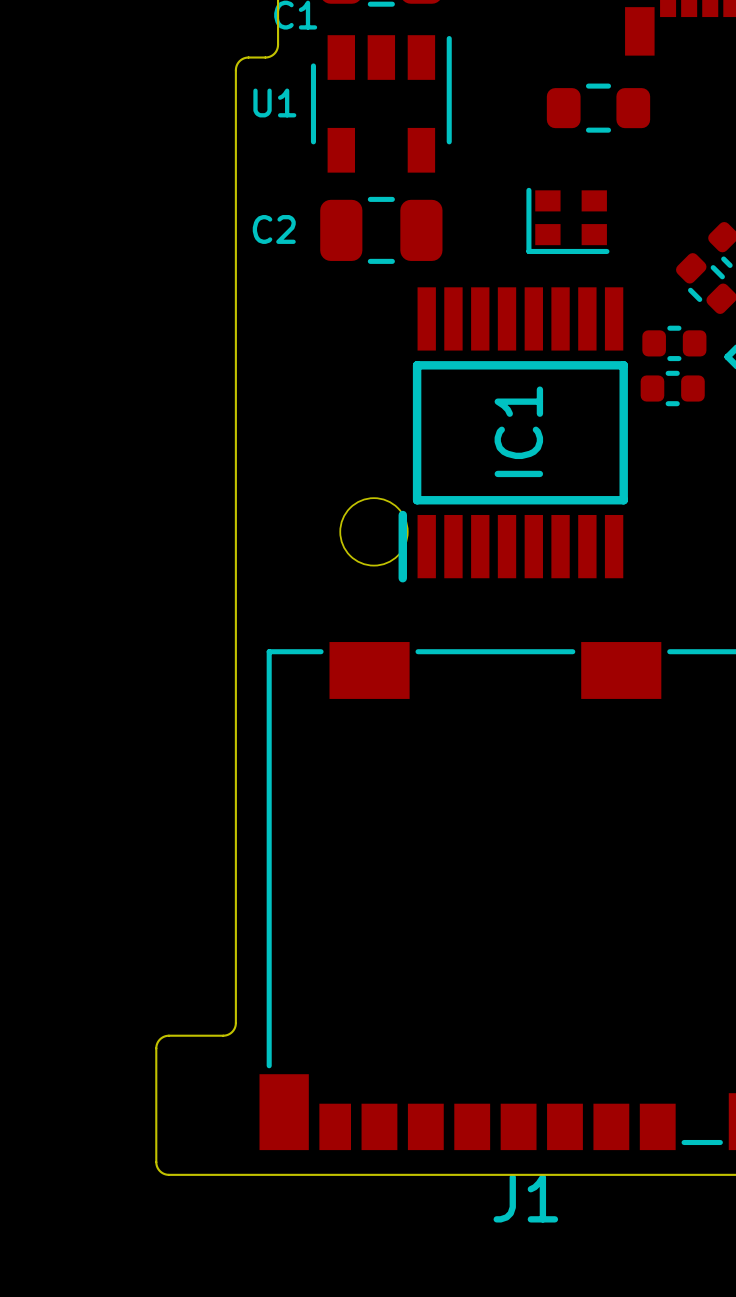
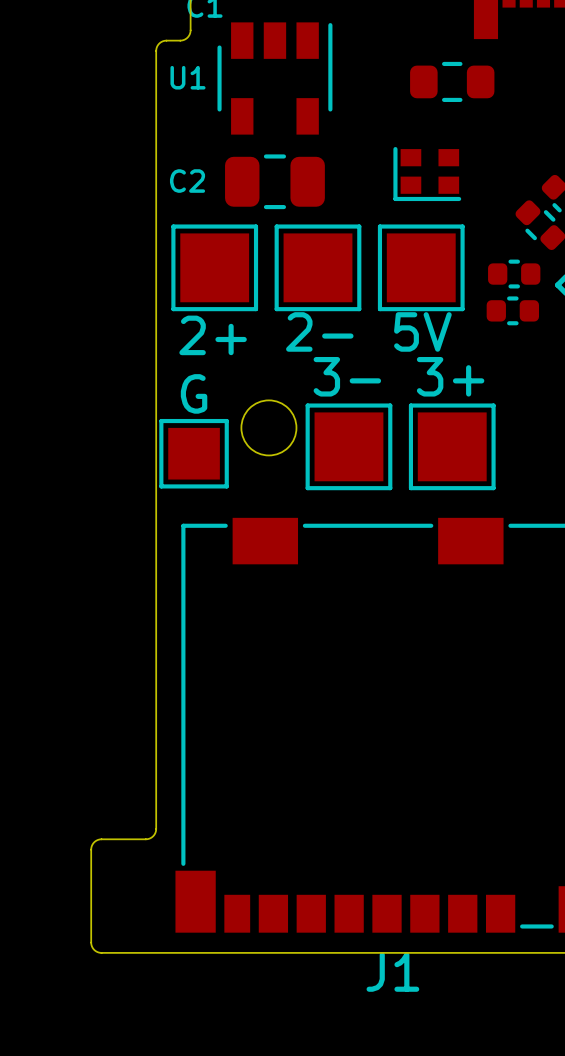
2+: none -> (214, 267)
2-: none -> (317, 267)
5V: none -> (421, 267)
IC1: (513, 434) -> none
3-: none -> (348, 446)
3+: none -> (452, 446)
G: none -> (194, 453)

